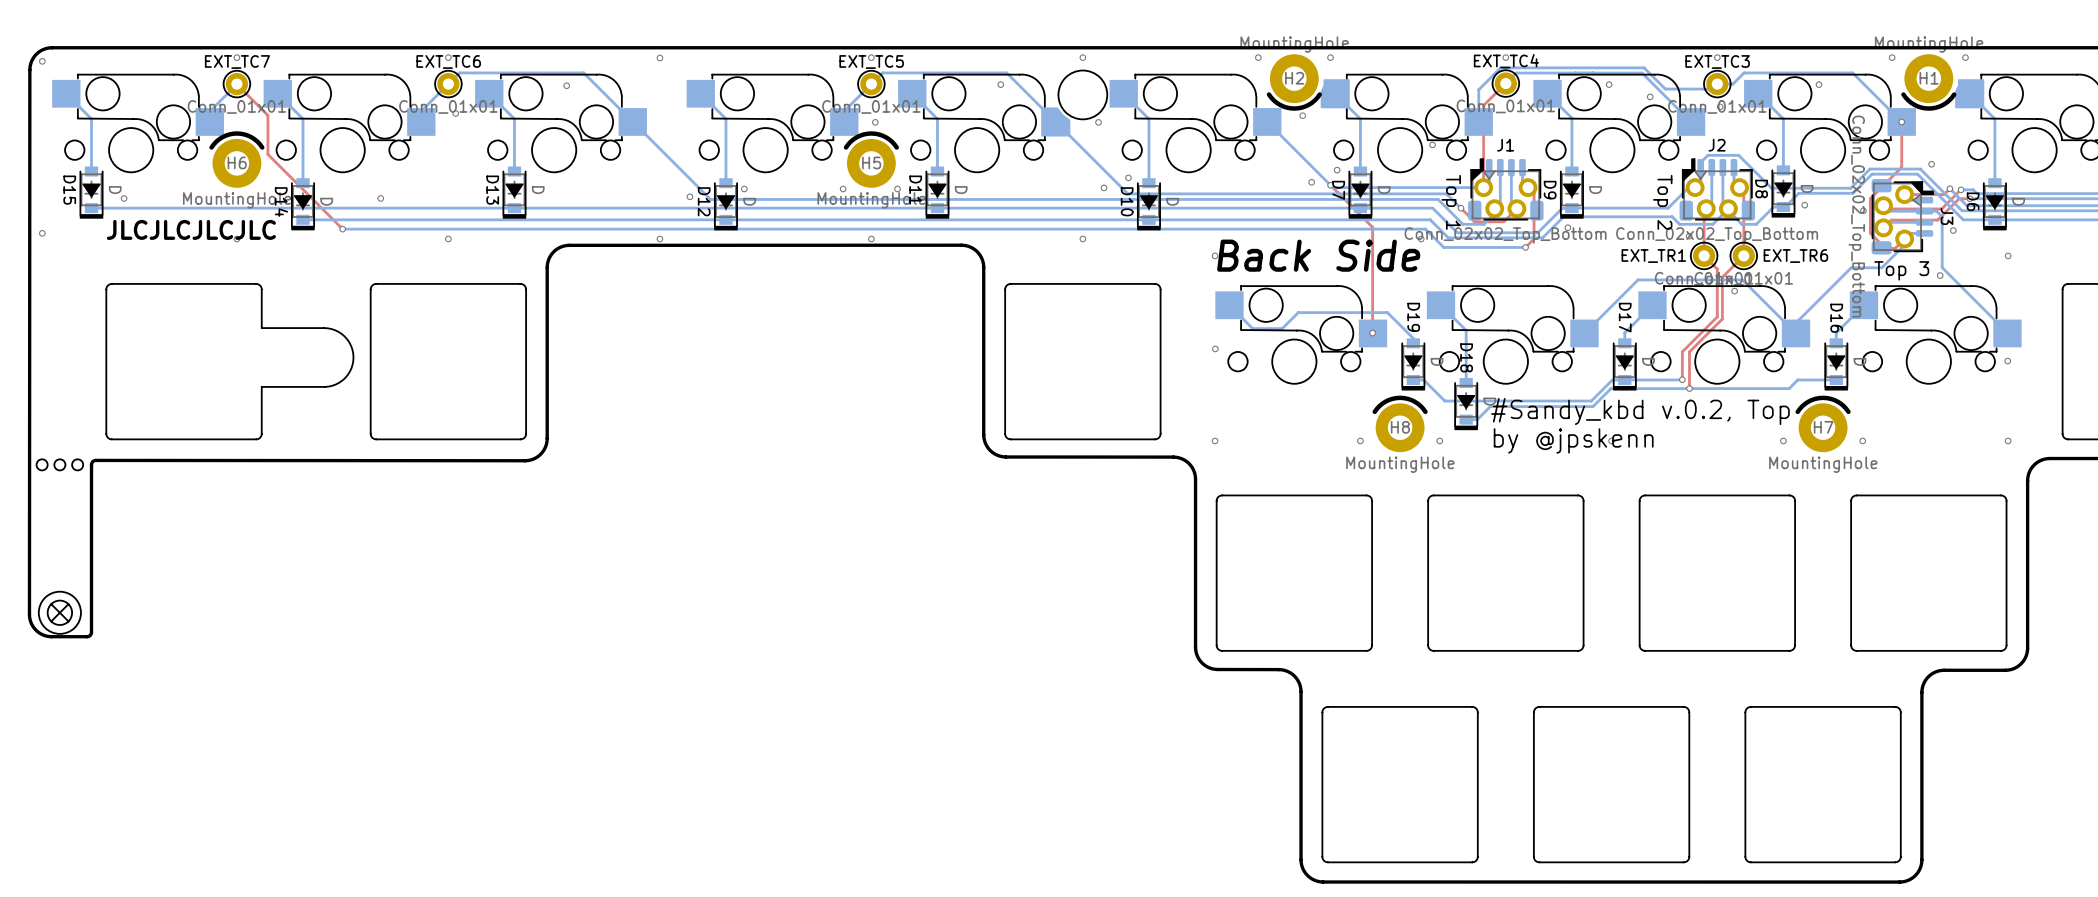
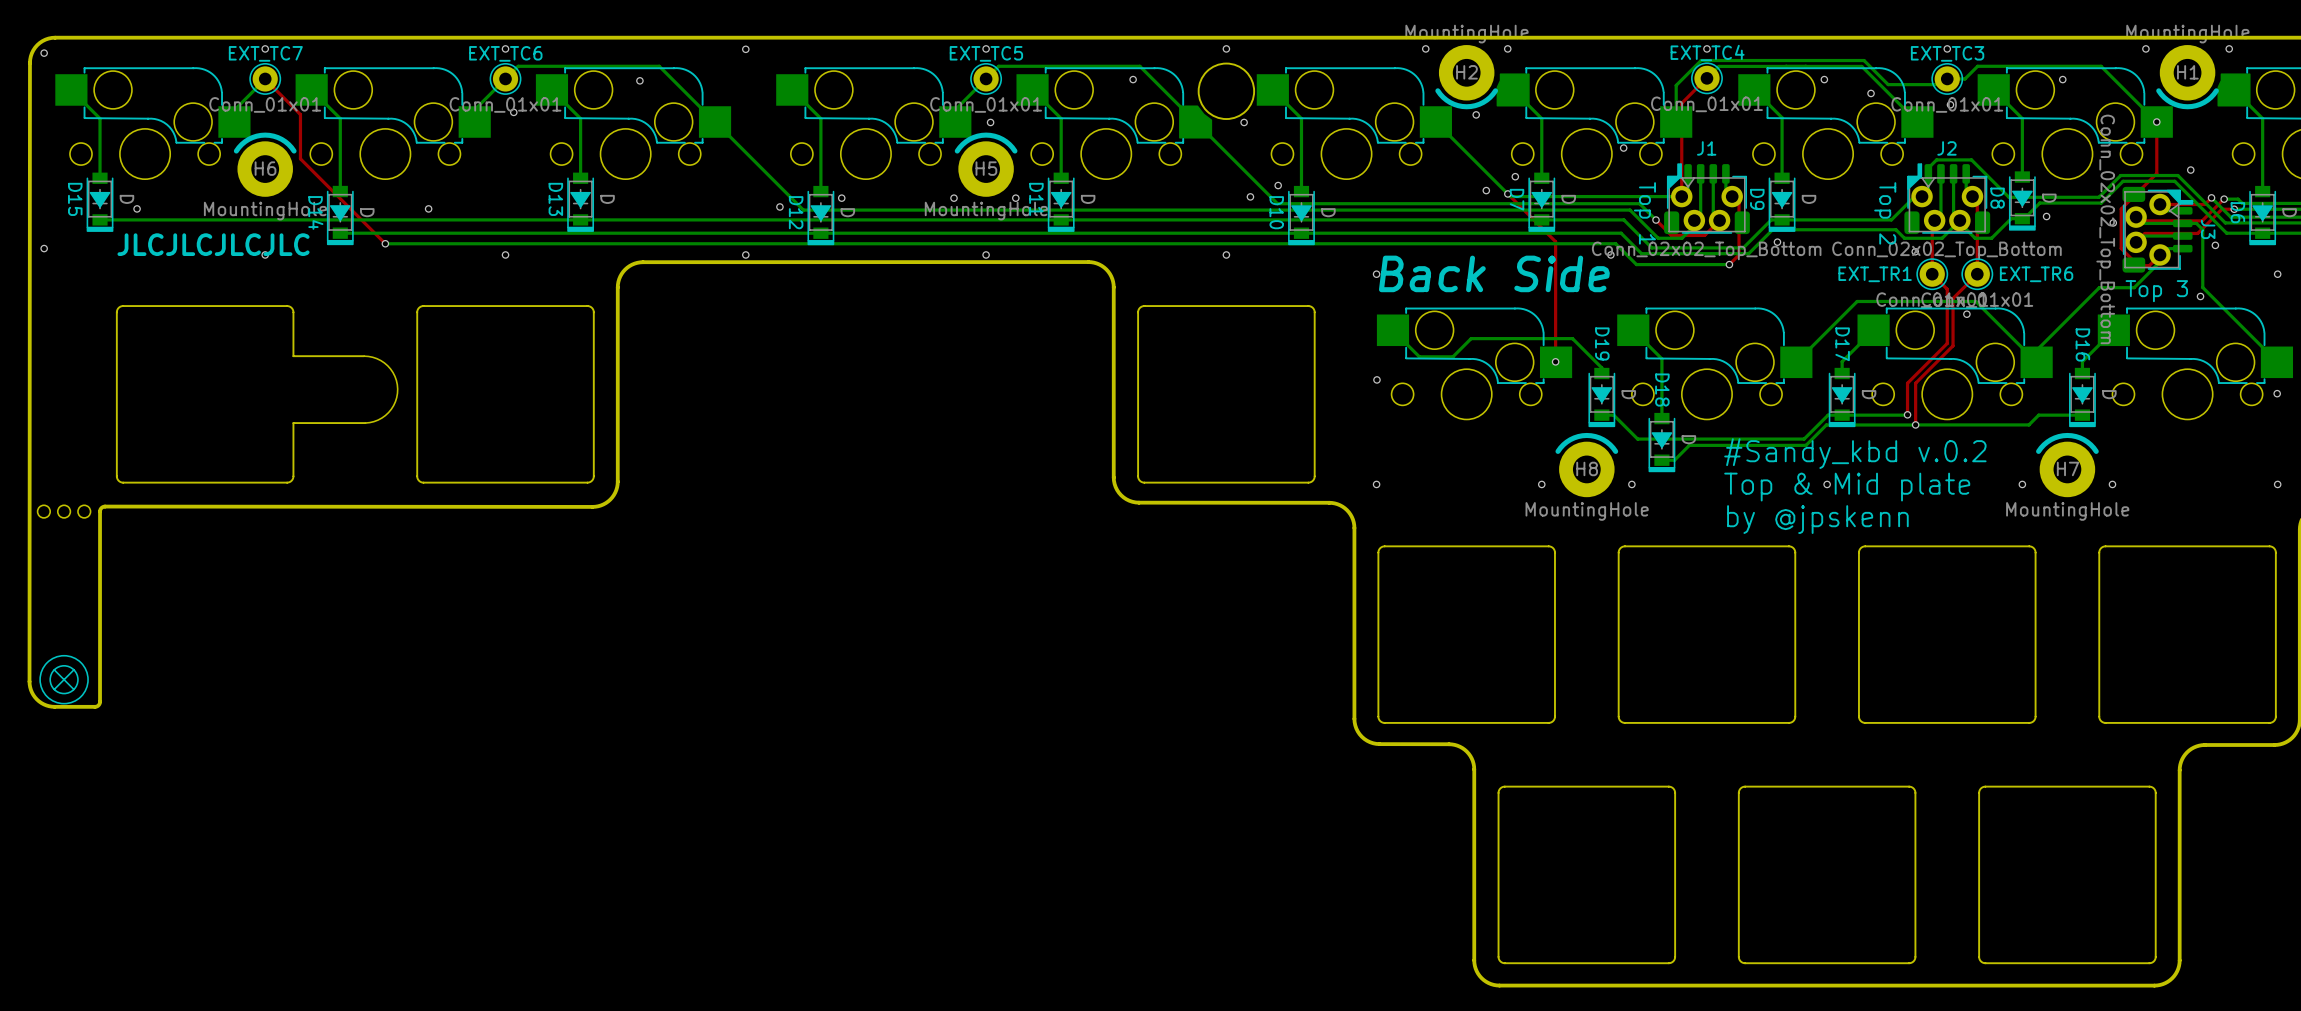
text: #Sandy_kbd v.0.2, Top (1640, 411) -> #Sandy_kbd v.0.2 (1855, 453)
text position: by @jpskenn (1573, 440) -> by @jpskenn (1817, 519)
text: none -> Top & Mid plate (1847, 487)

